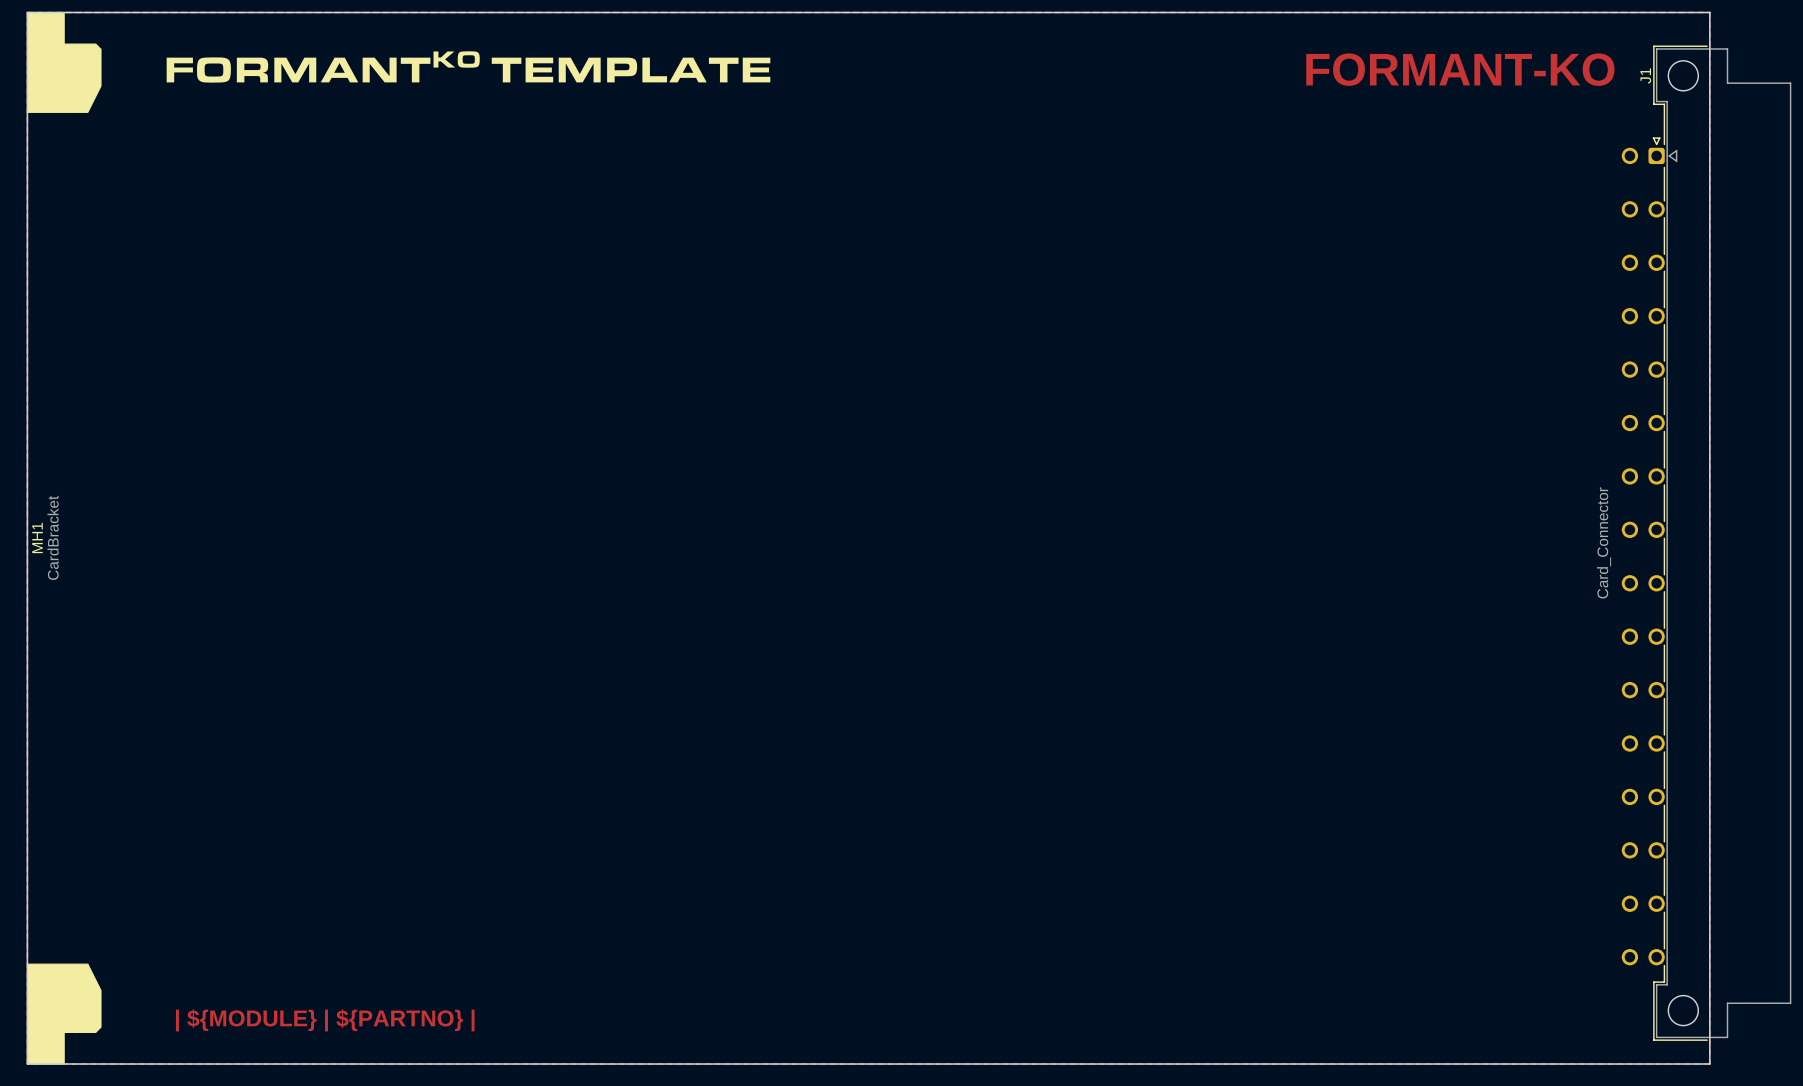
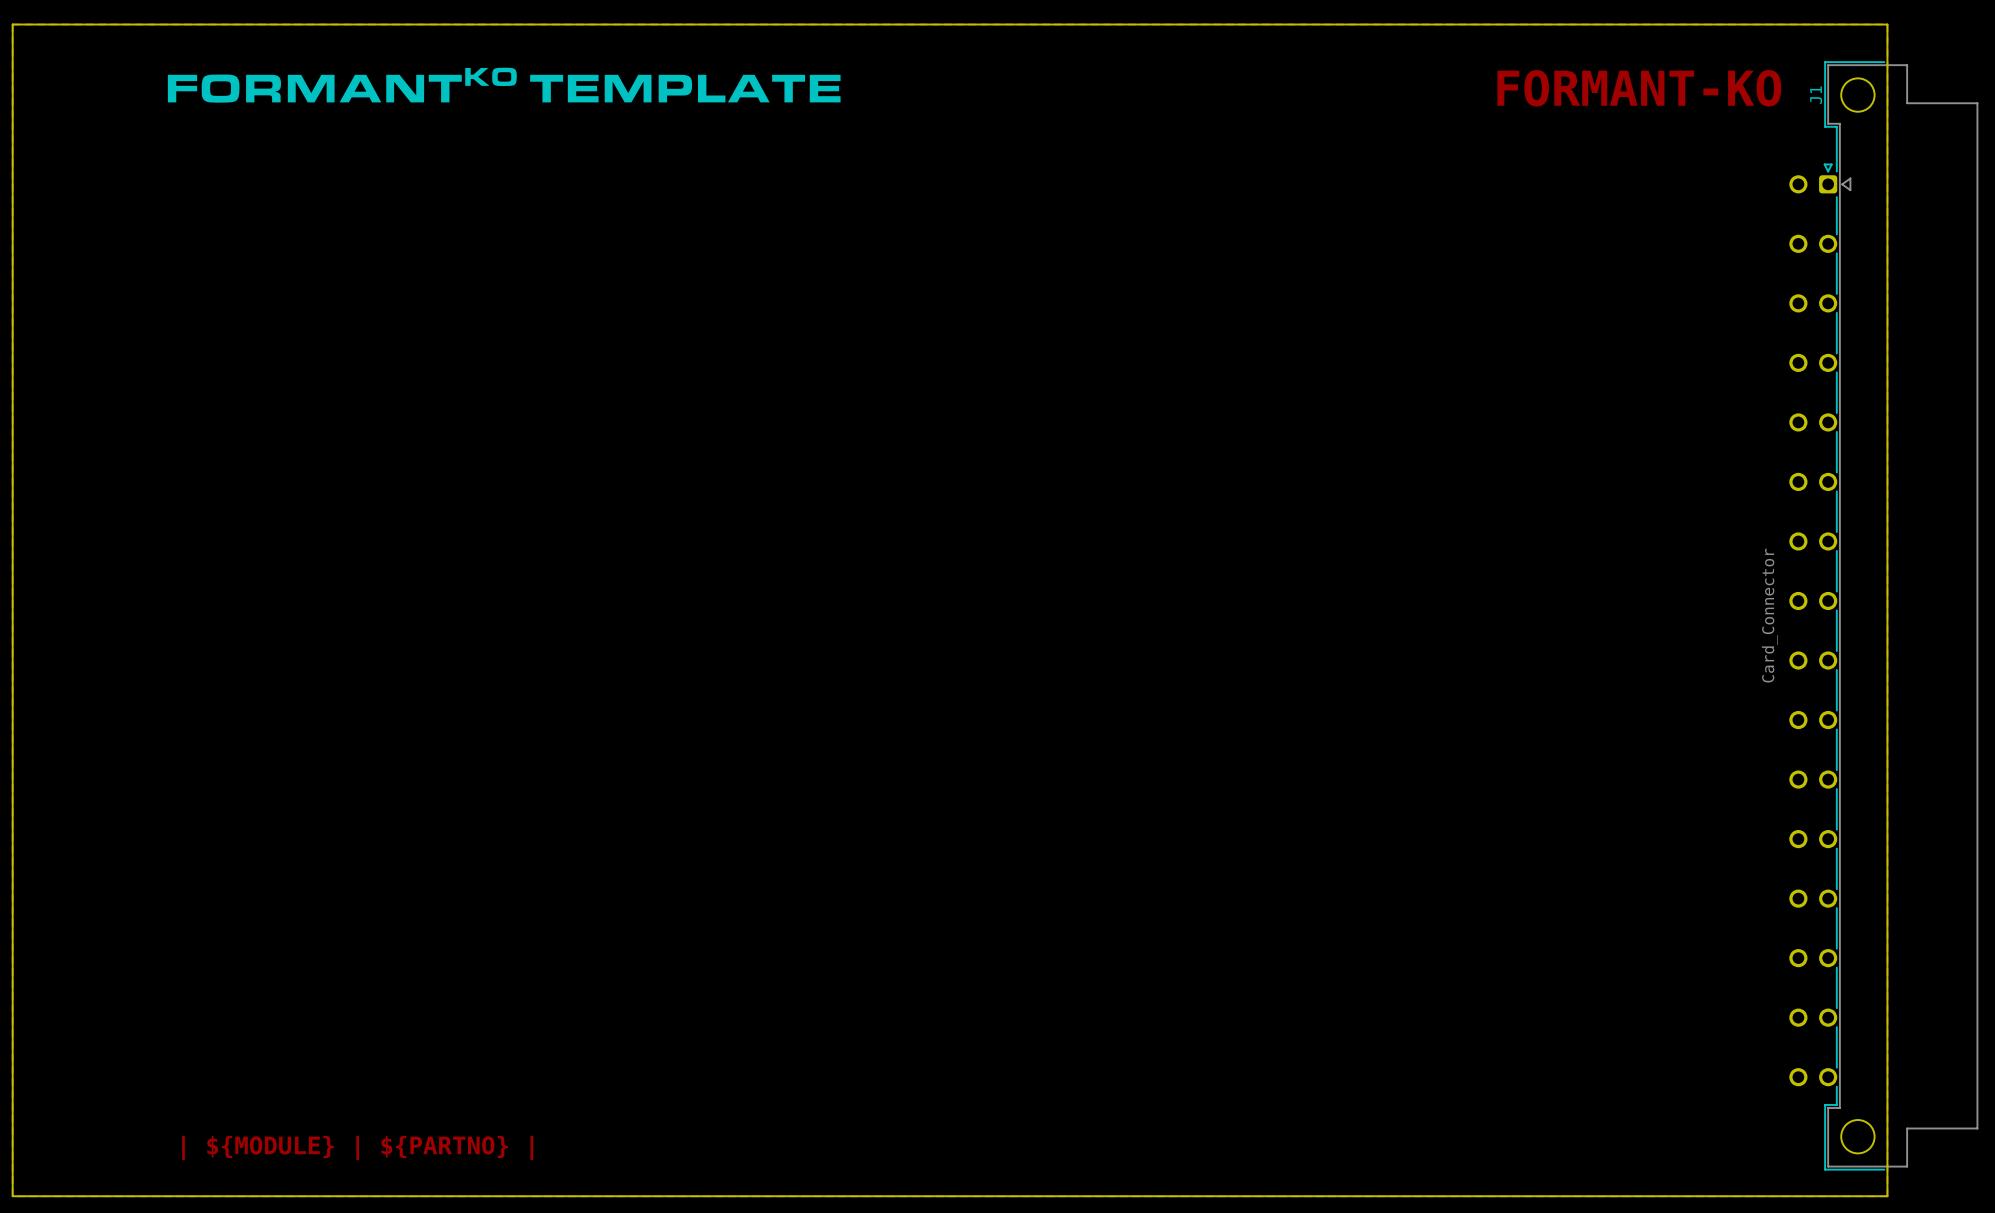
MH1: CardBracket (64, 538) -> none

